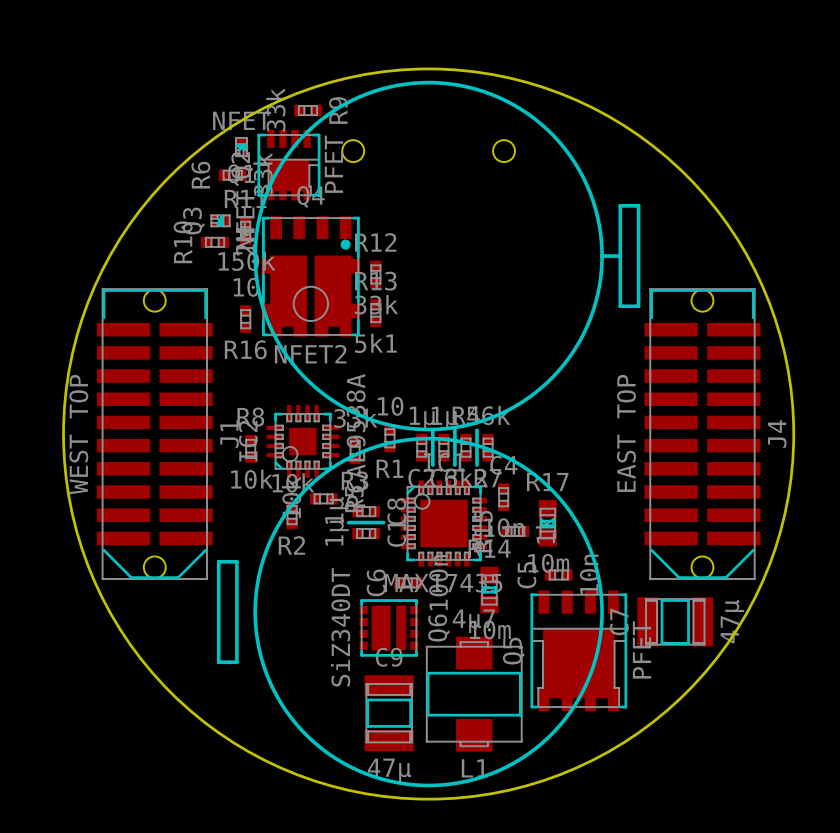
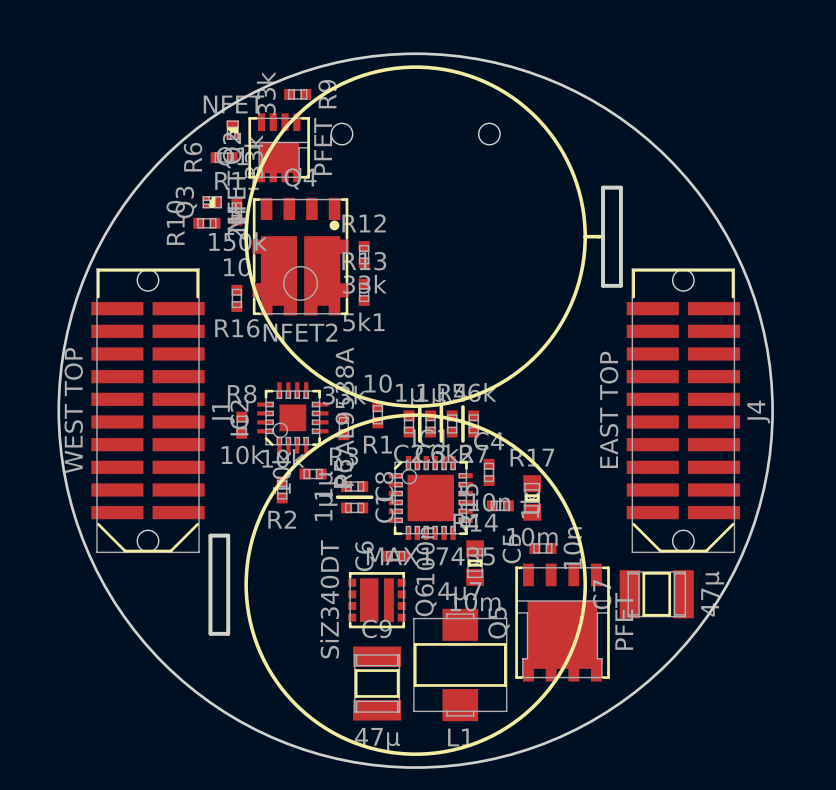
board edge: none -> (603, 187) (620, 187) (620, 285) (603, 285) (603, 187)
board edge: none -> (210, 535) (210, 633) (228, 633) (228, 535) (210, 535)

